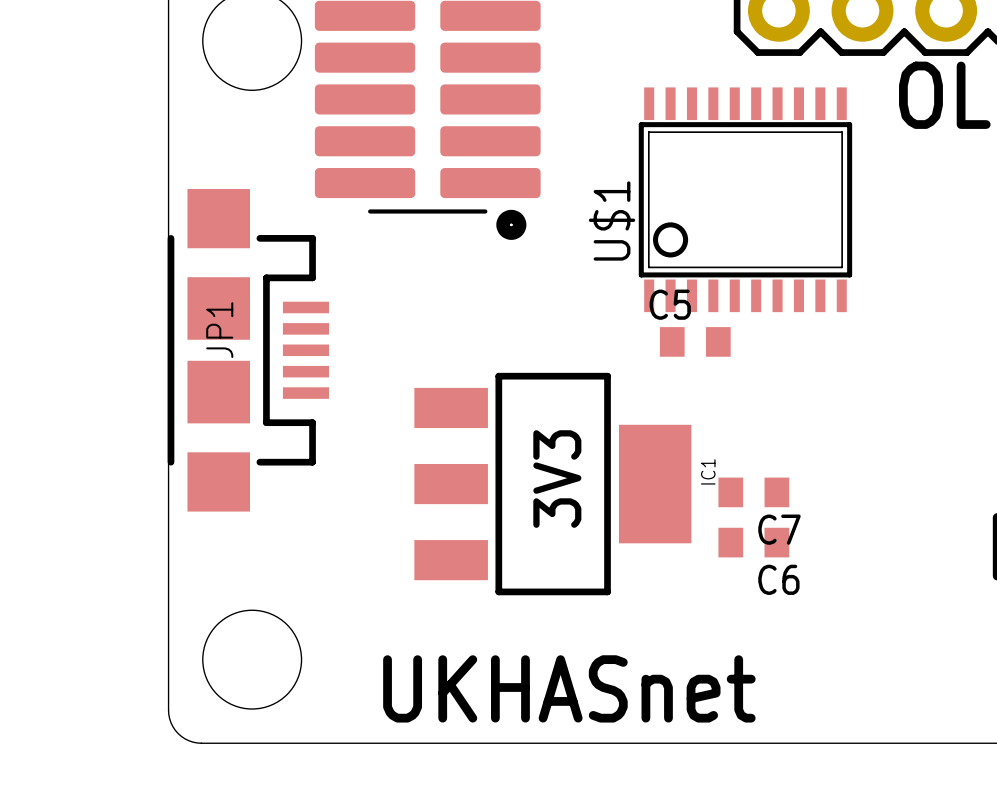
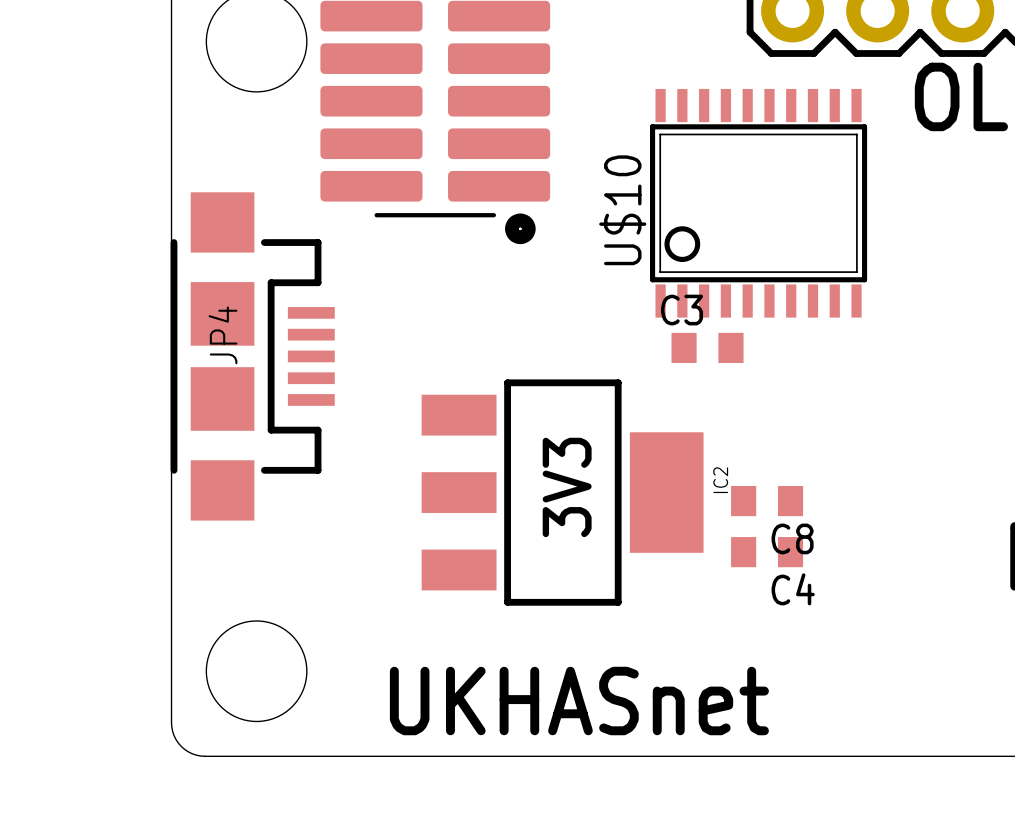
U$1 name: U$1 (612, 220) -> U$10 (622, 210)
C5 name: C5 (670, 304) -> C3 (682, 310)
JP1 name: JP1 (219, 330) -> JP4 (222, 335)
IC1 name: IC1 (708, 471) -> IC2 (720, 480)
C7 name: C7 (779, 529) -> C8 (792, 538)
C6 name: C6 (778, 579) -> C4 (793, 589)

